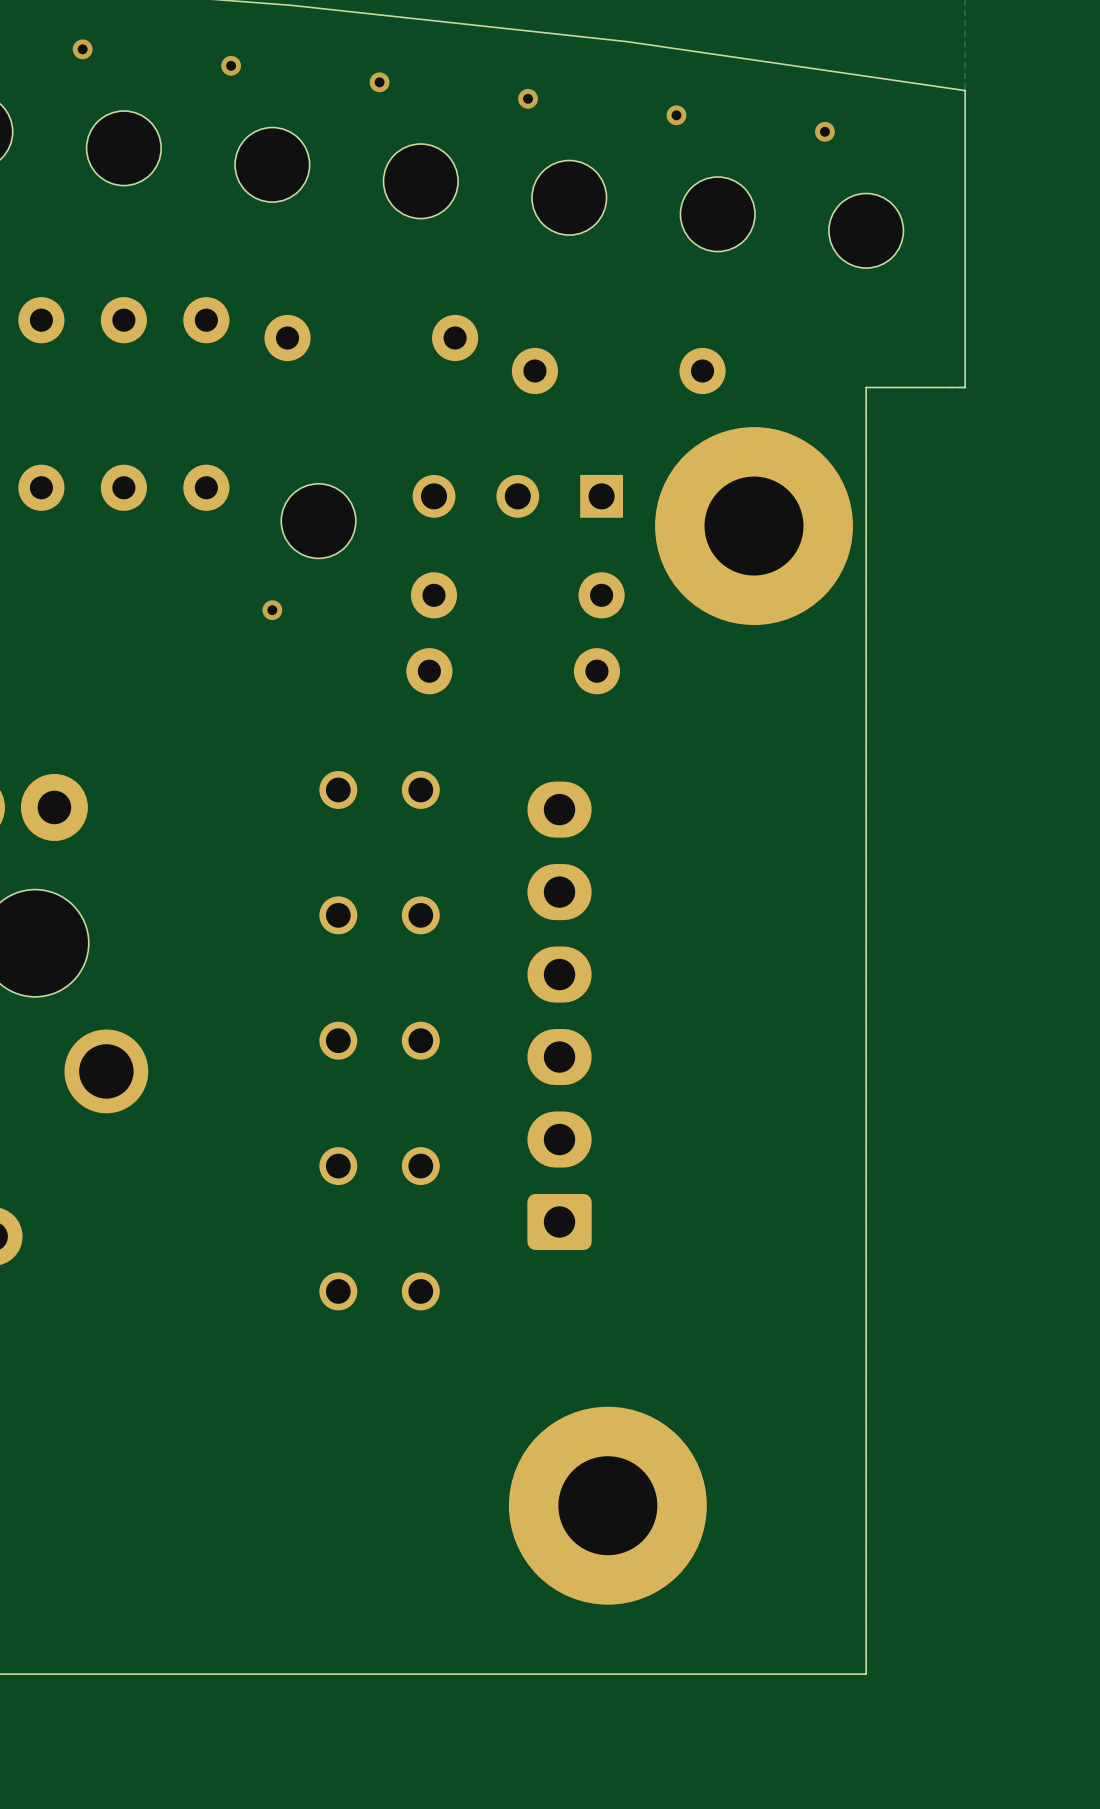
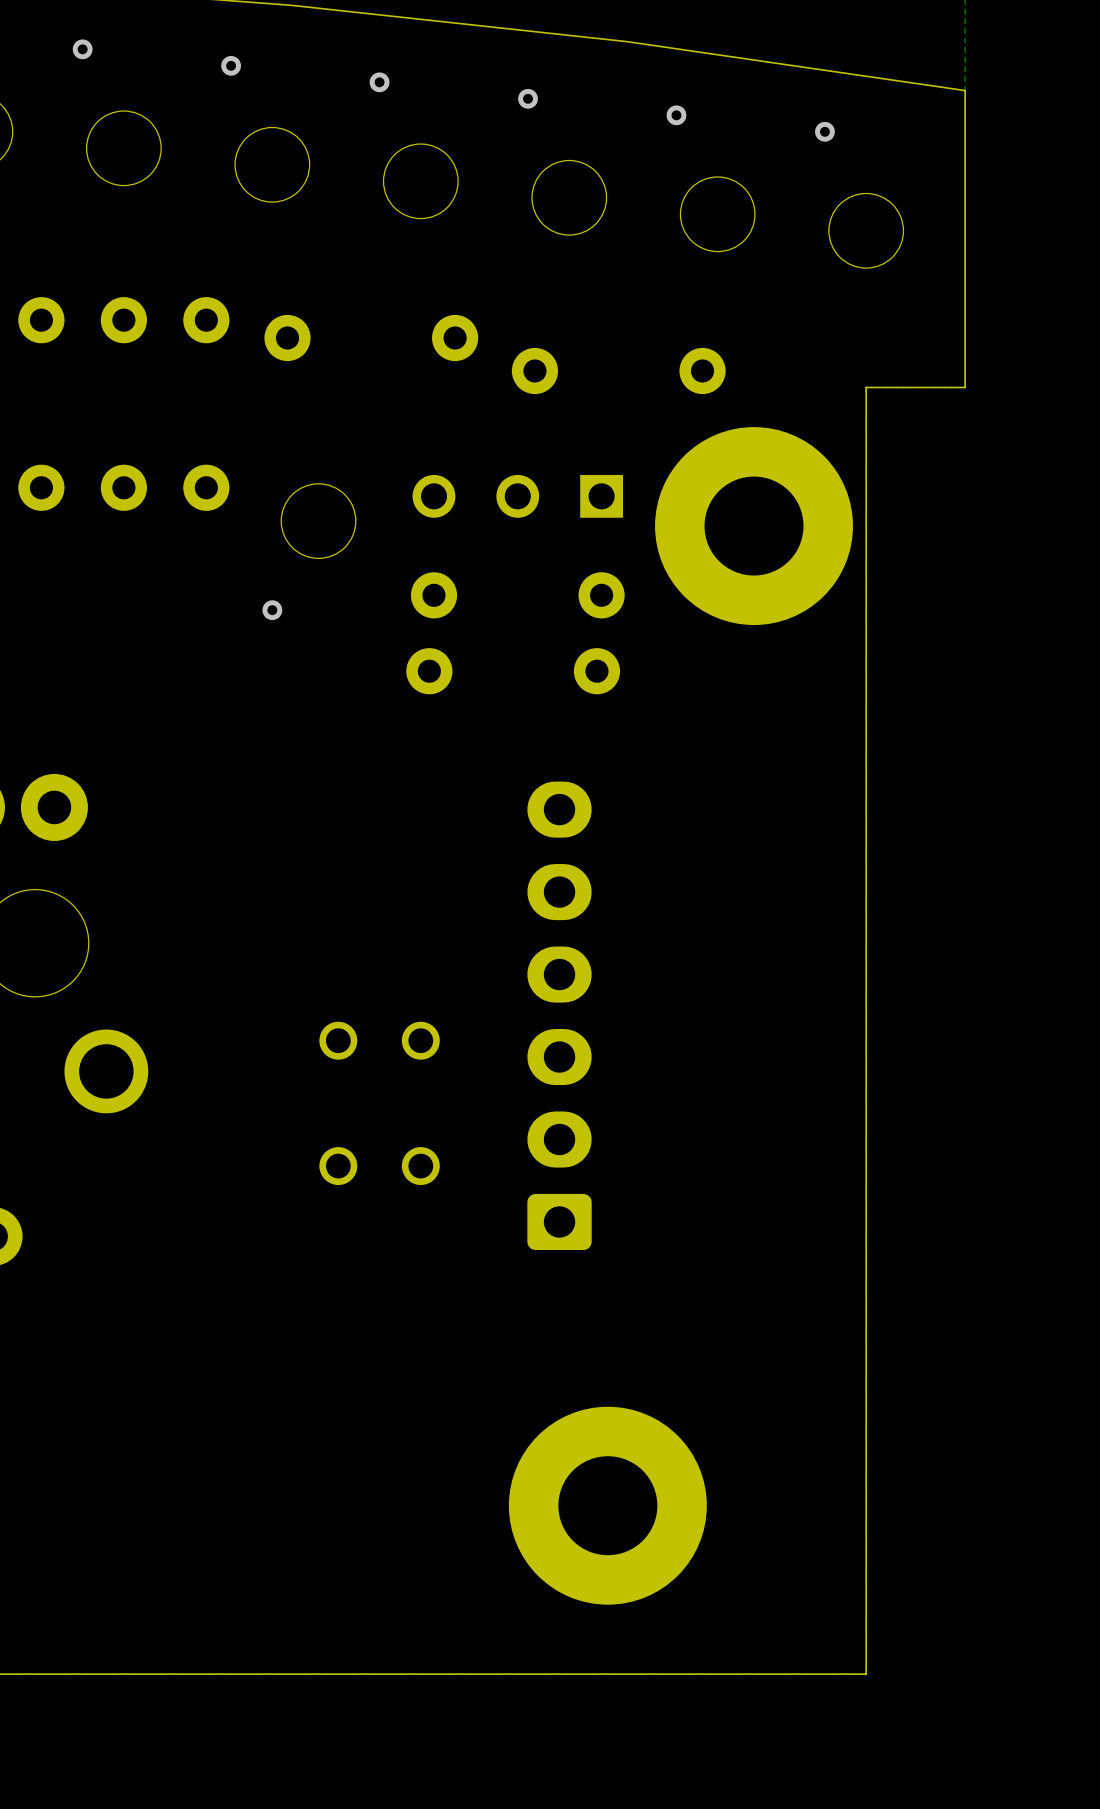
part: (379, 789) -> none
part: (379, 915) -> none
part: (379, 1291) -> none

